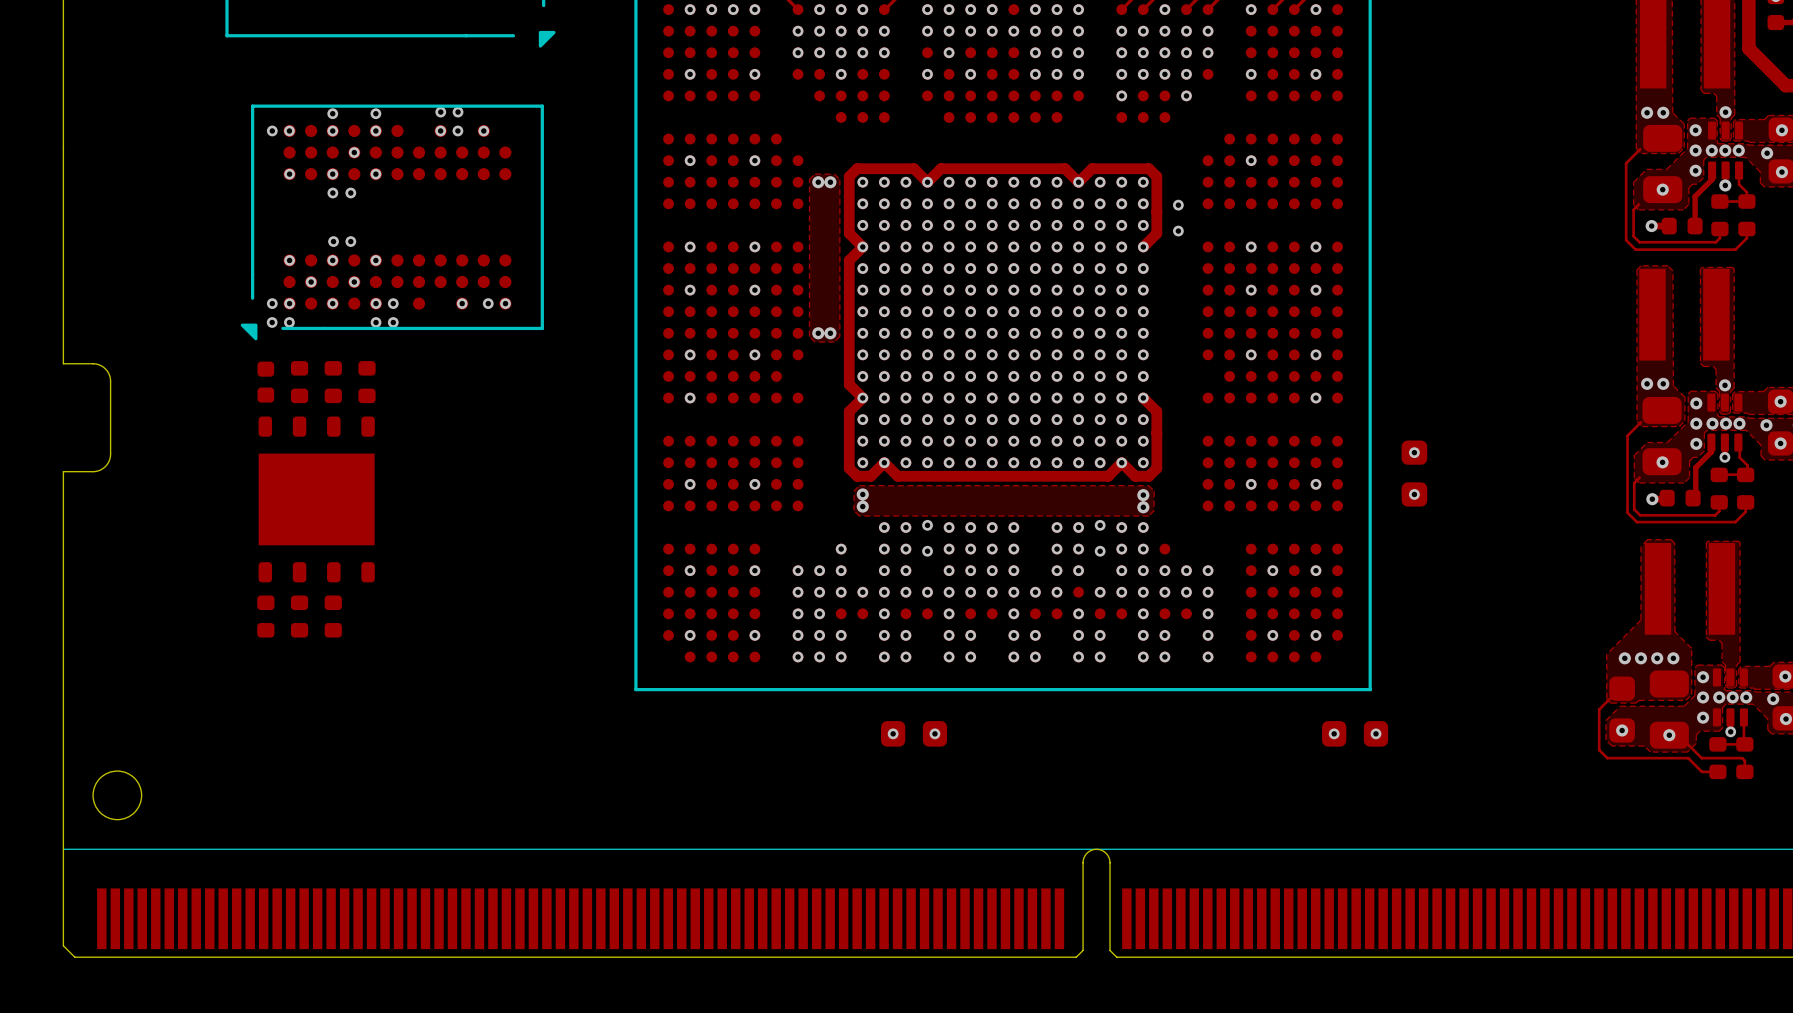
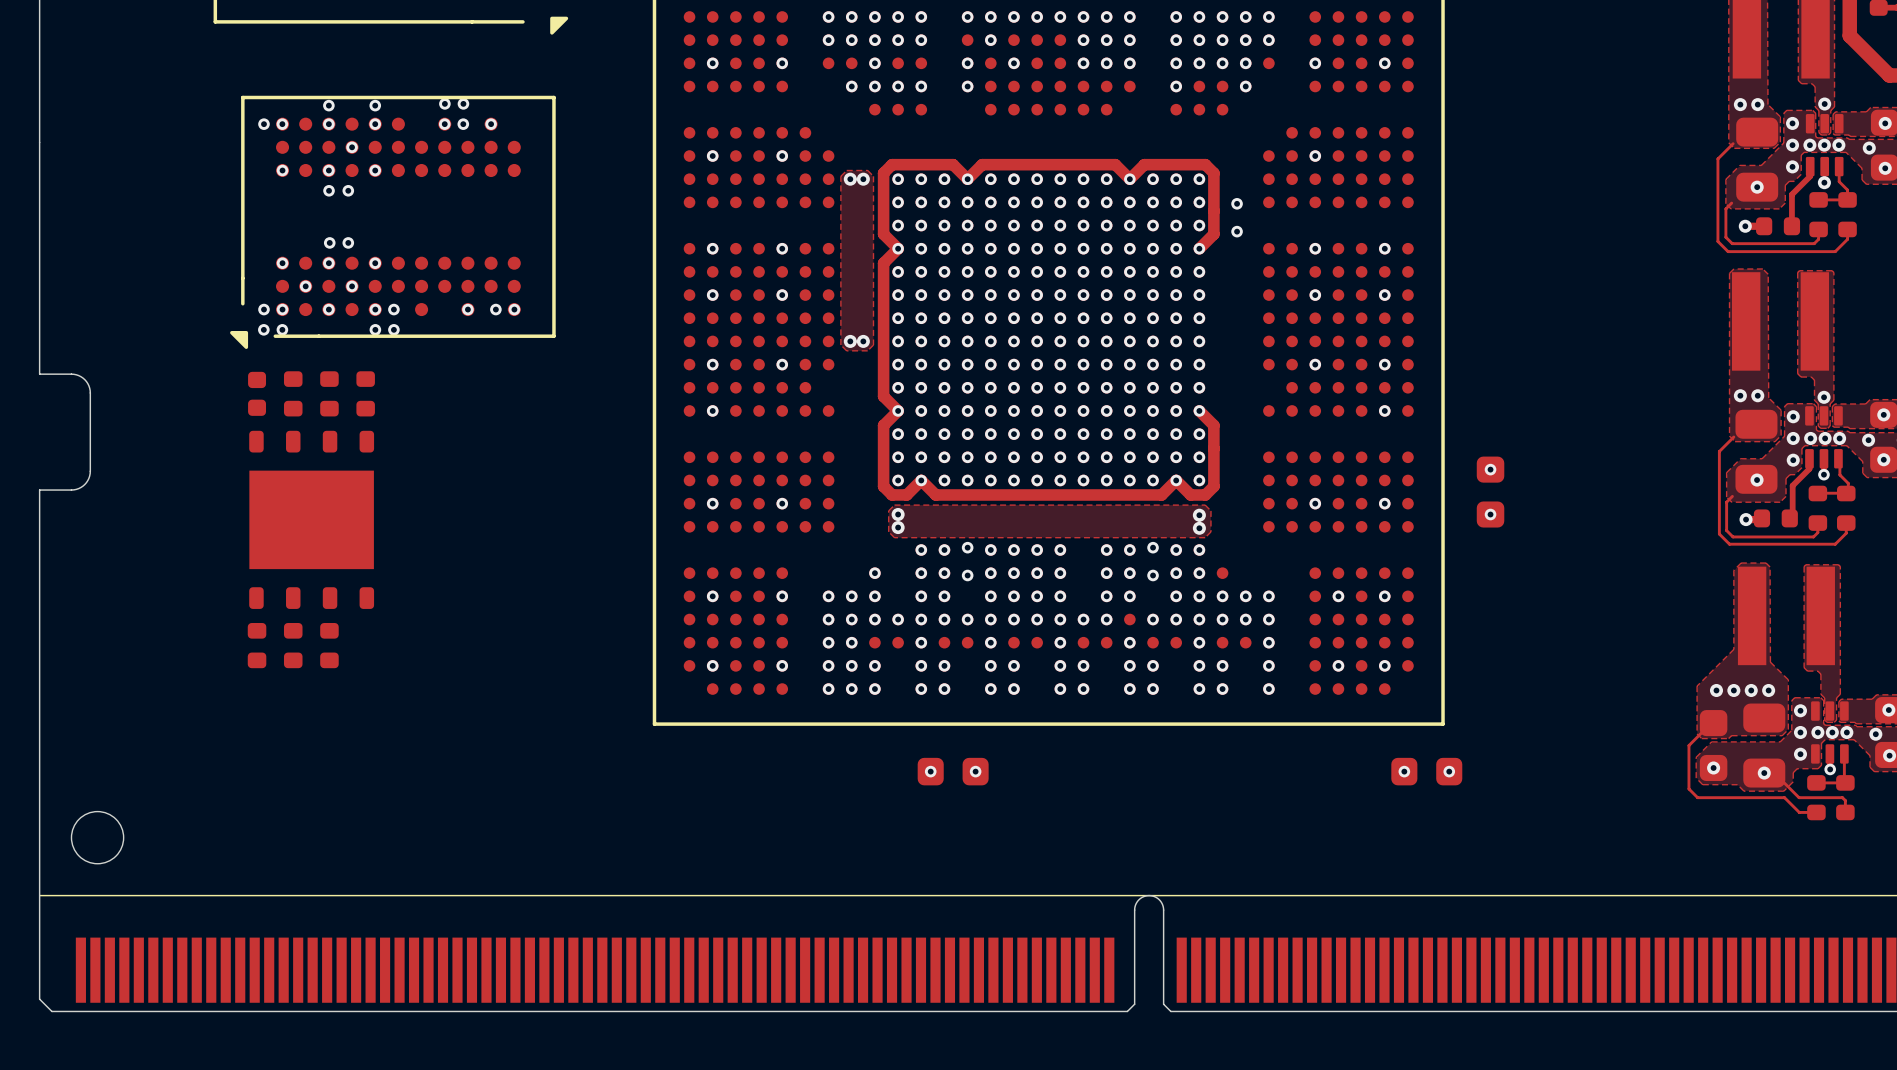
via: none -> (851, 86)
via: none -> (874, 86)
via: none -> (898, 86)
via: none -> (921, 86)
via: none -> (967, 86)

